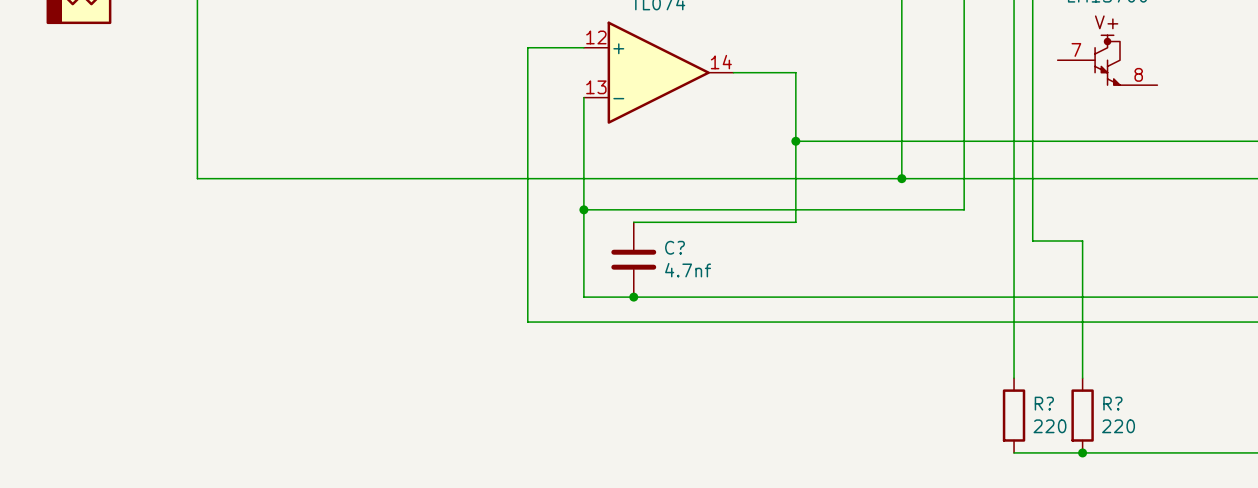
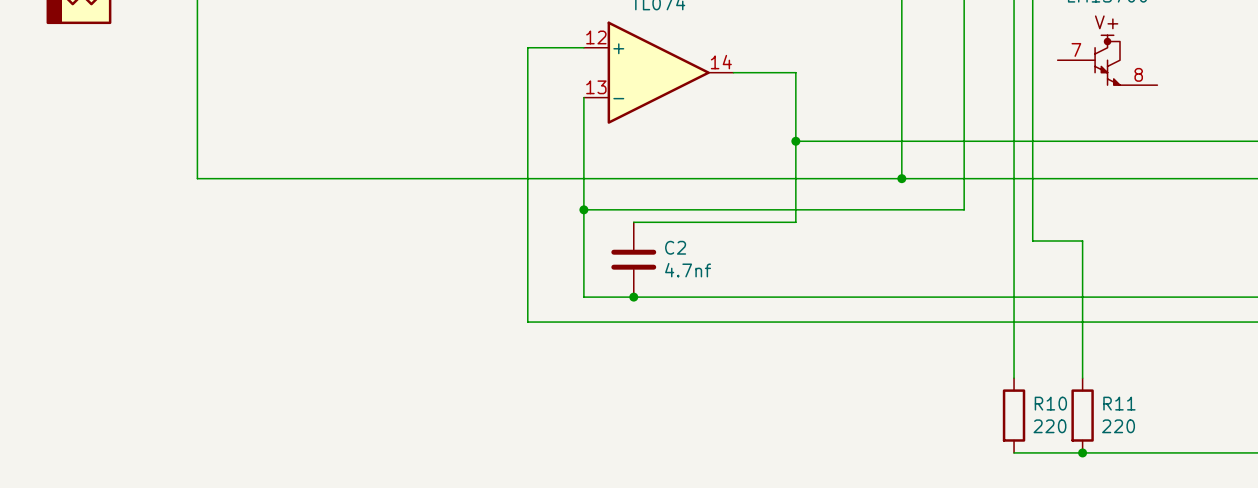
C? name: C? (675, 247) -> C2 (675, 247)
R? name: R? (1044, 403) -> R10 (1050, 403)
R? name: R? (1112, 403) -> R11 (1119, 403)

